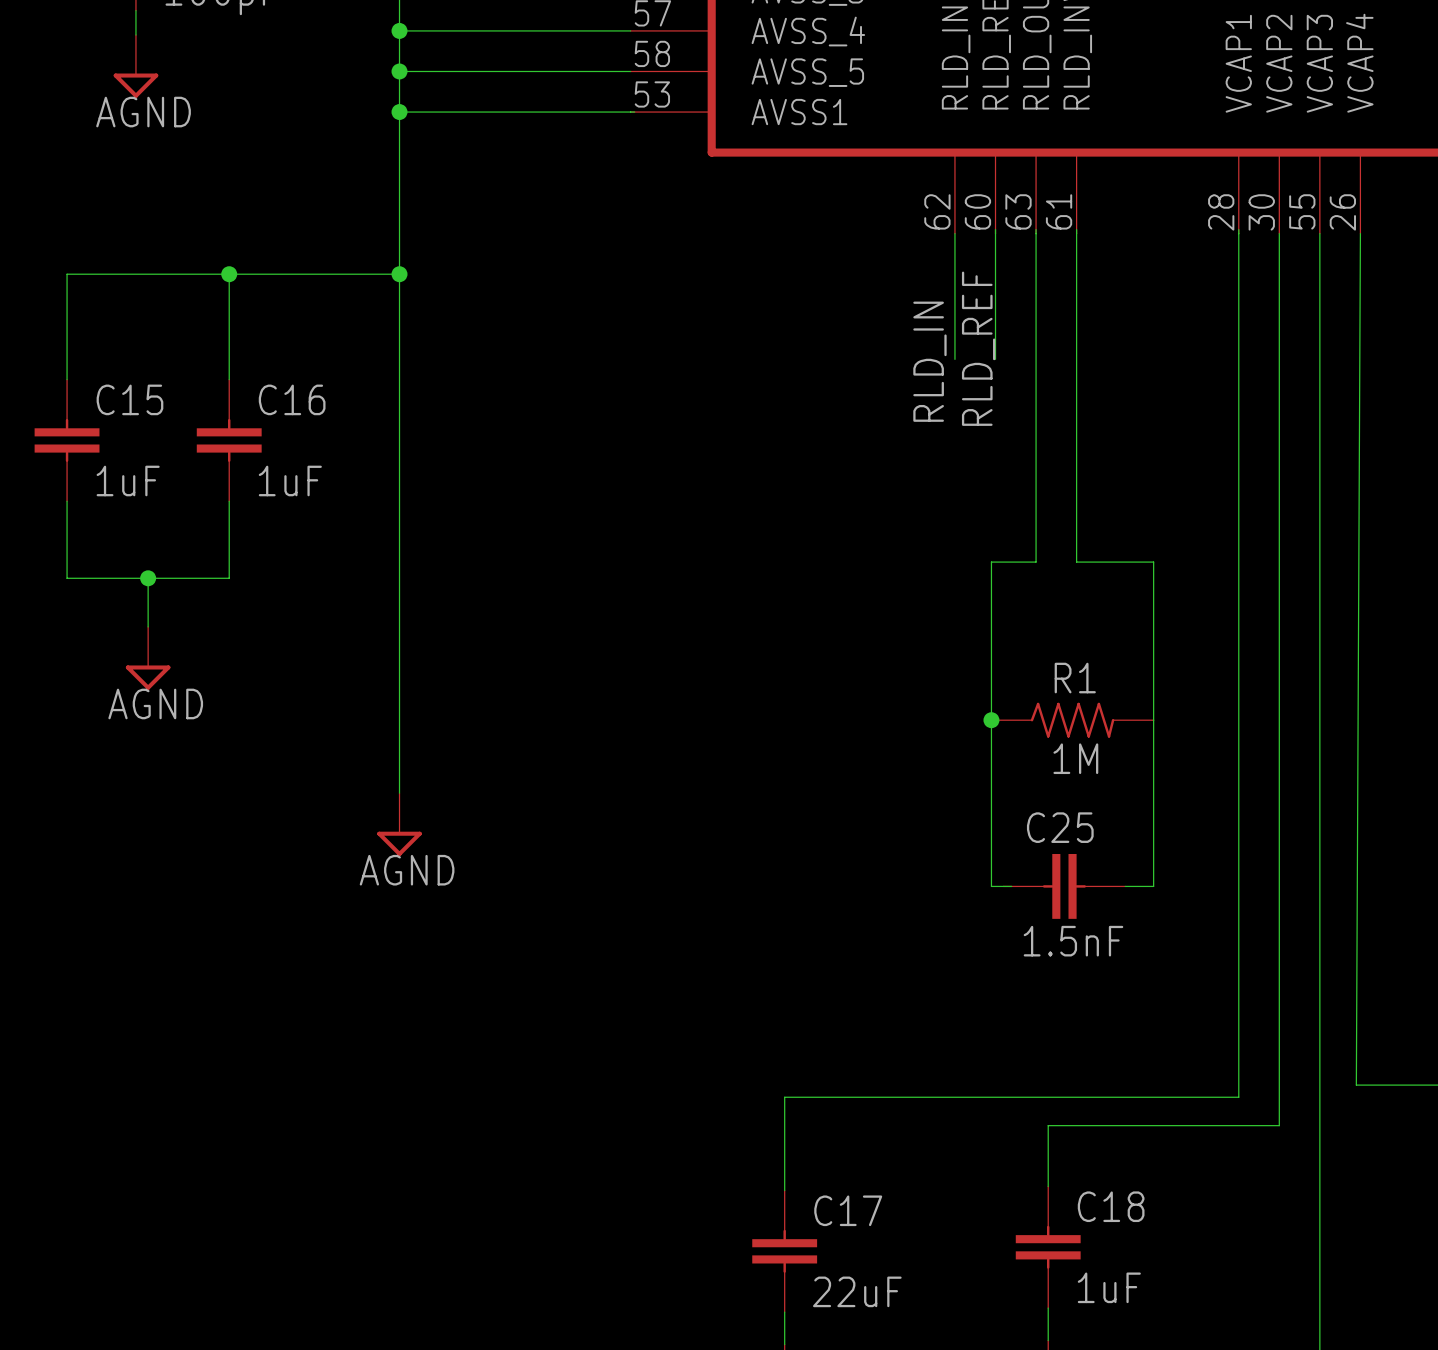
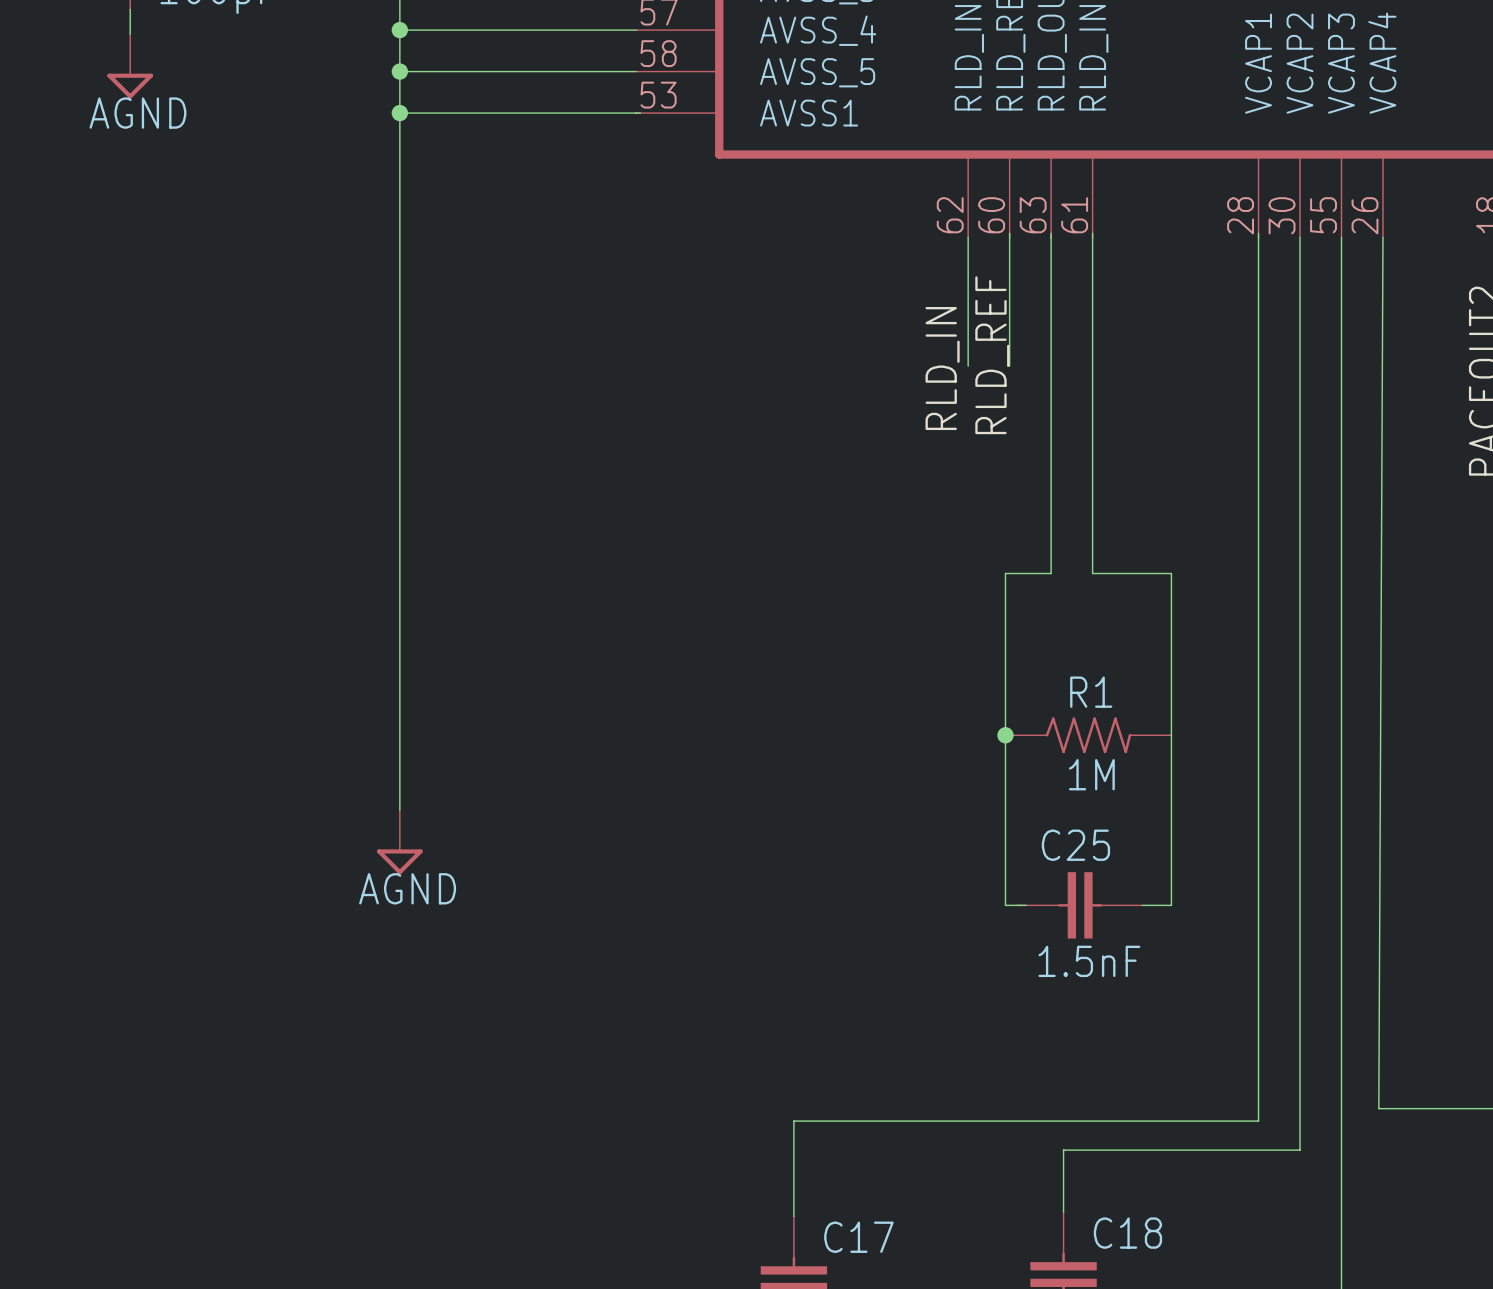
wire: (229, 274) (229, 379) -> none
junction: (229, 274) -> none
wire: (399, 274) (67, 274) (67, 379) -> none
junction: (399, 274) -> none
C15: 1uF (67, 440) -> none
C16: 1uF (229, 440) -> none
wire: (67, 501) (67, 578) (229, 578) (229, 501) -> none
wire: (148, 578) (148, 626) -> none
junction: (148, 578) -> none
power symbol: AGND (148, 658) -> none

